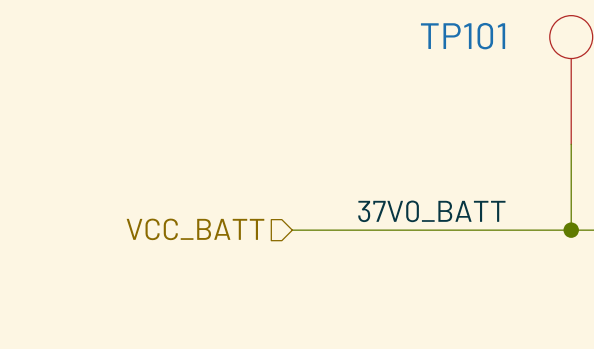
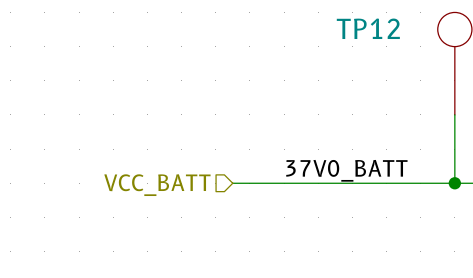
TP101 name: TP101 (463, 36) -> TP12 (368, 28)

